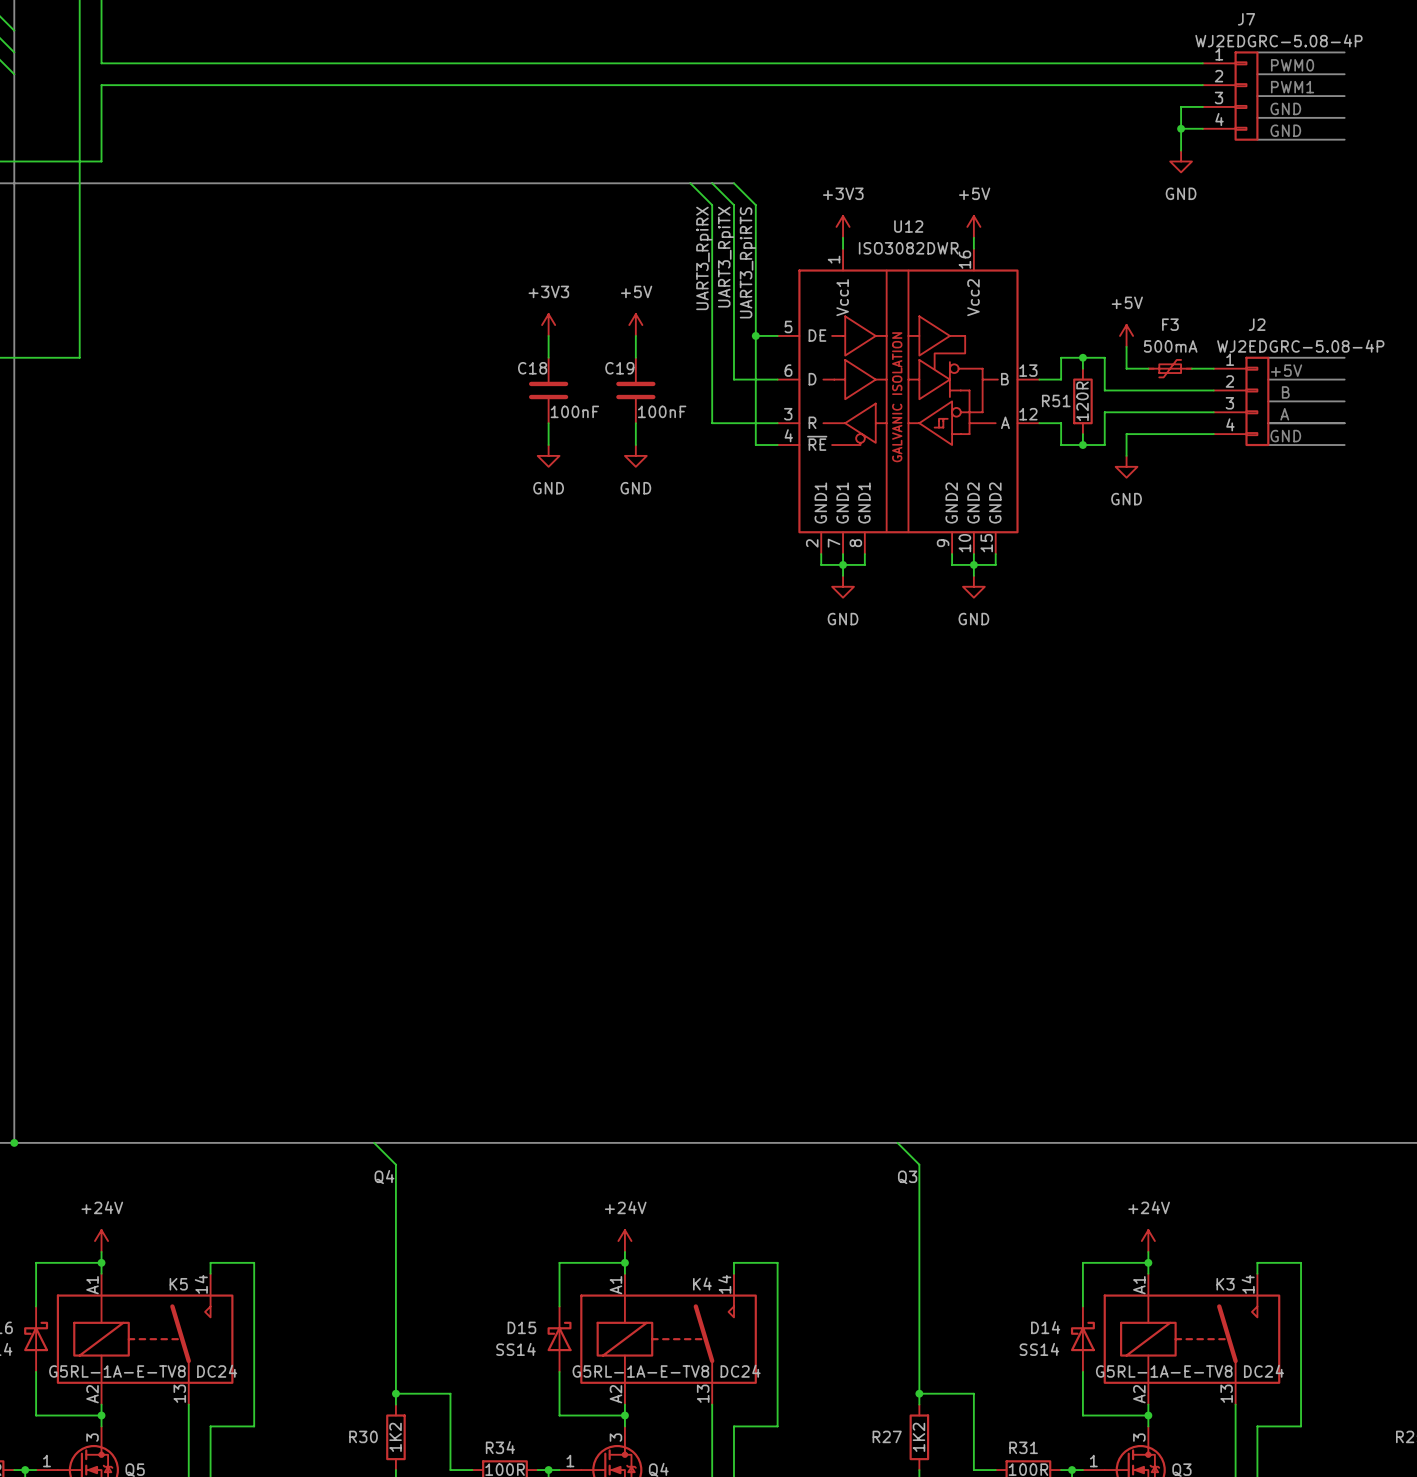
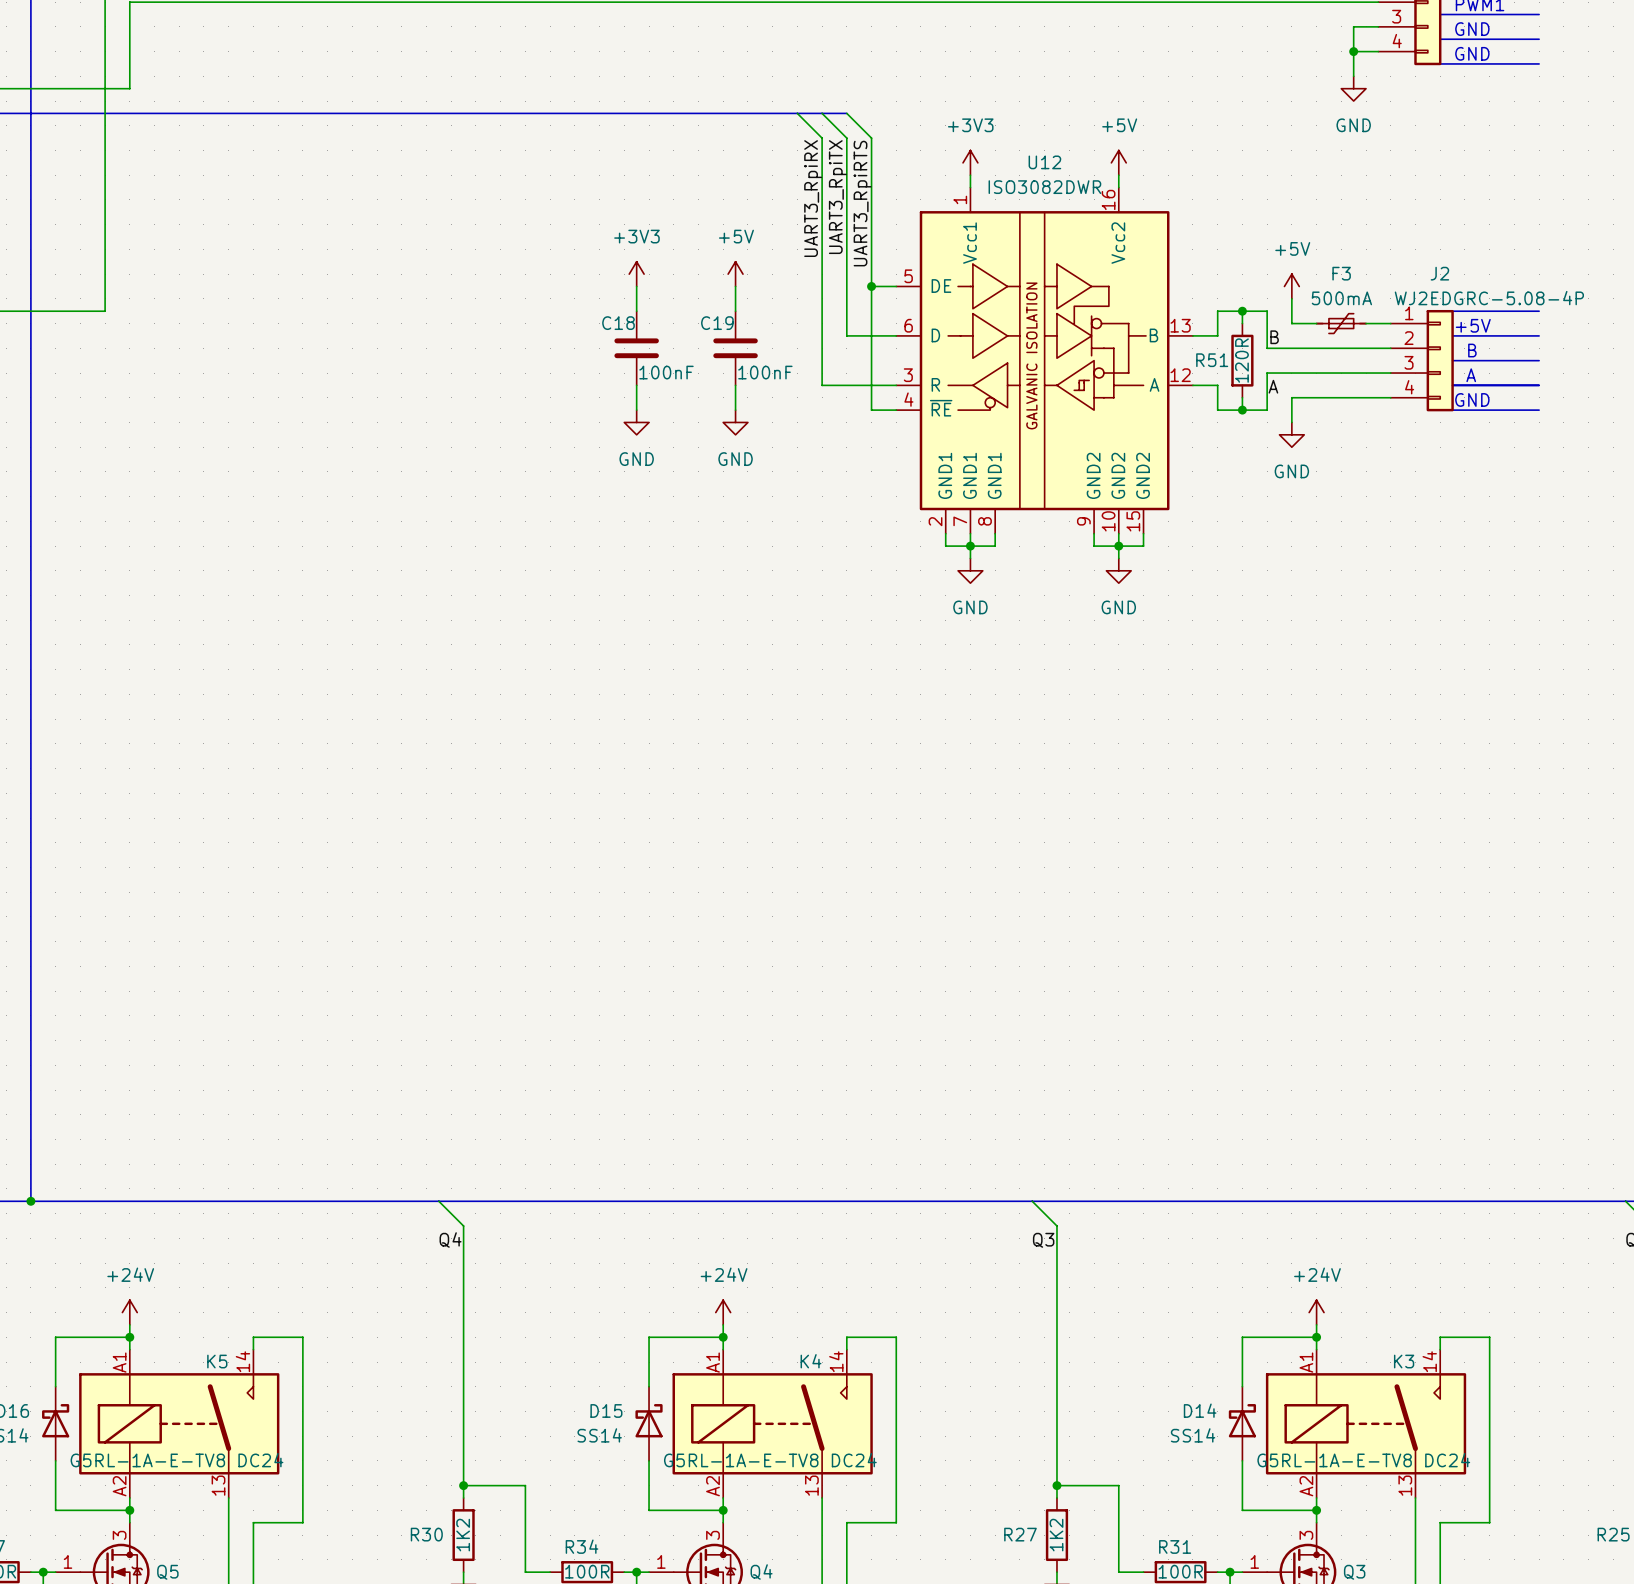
label: none -> B (1274, 337)
label: none -> A (1273, 386)

